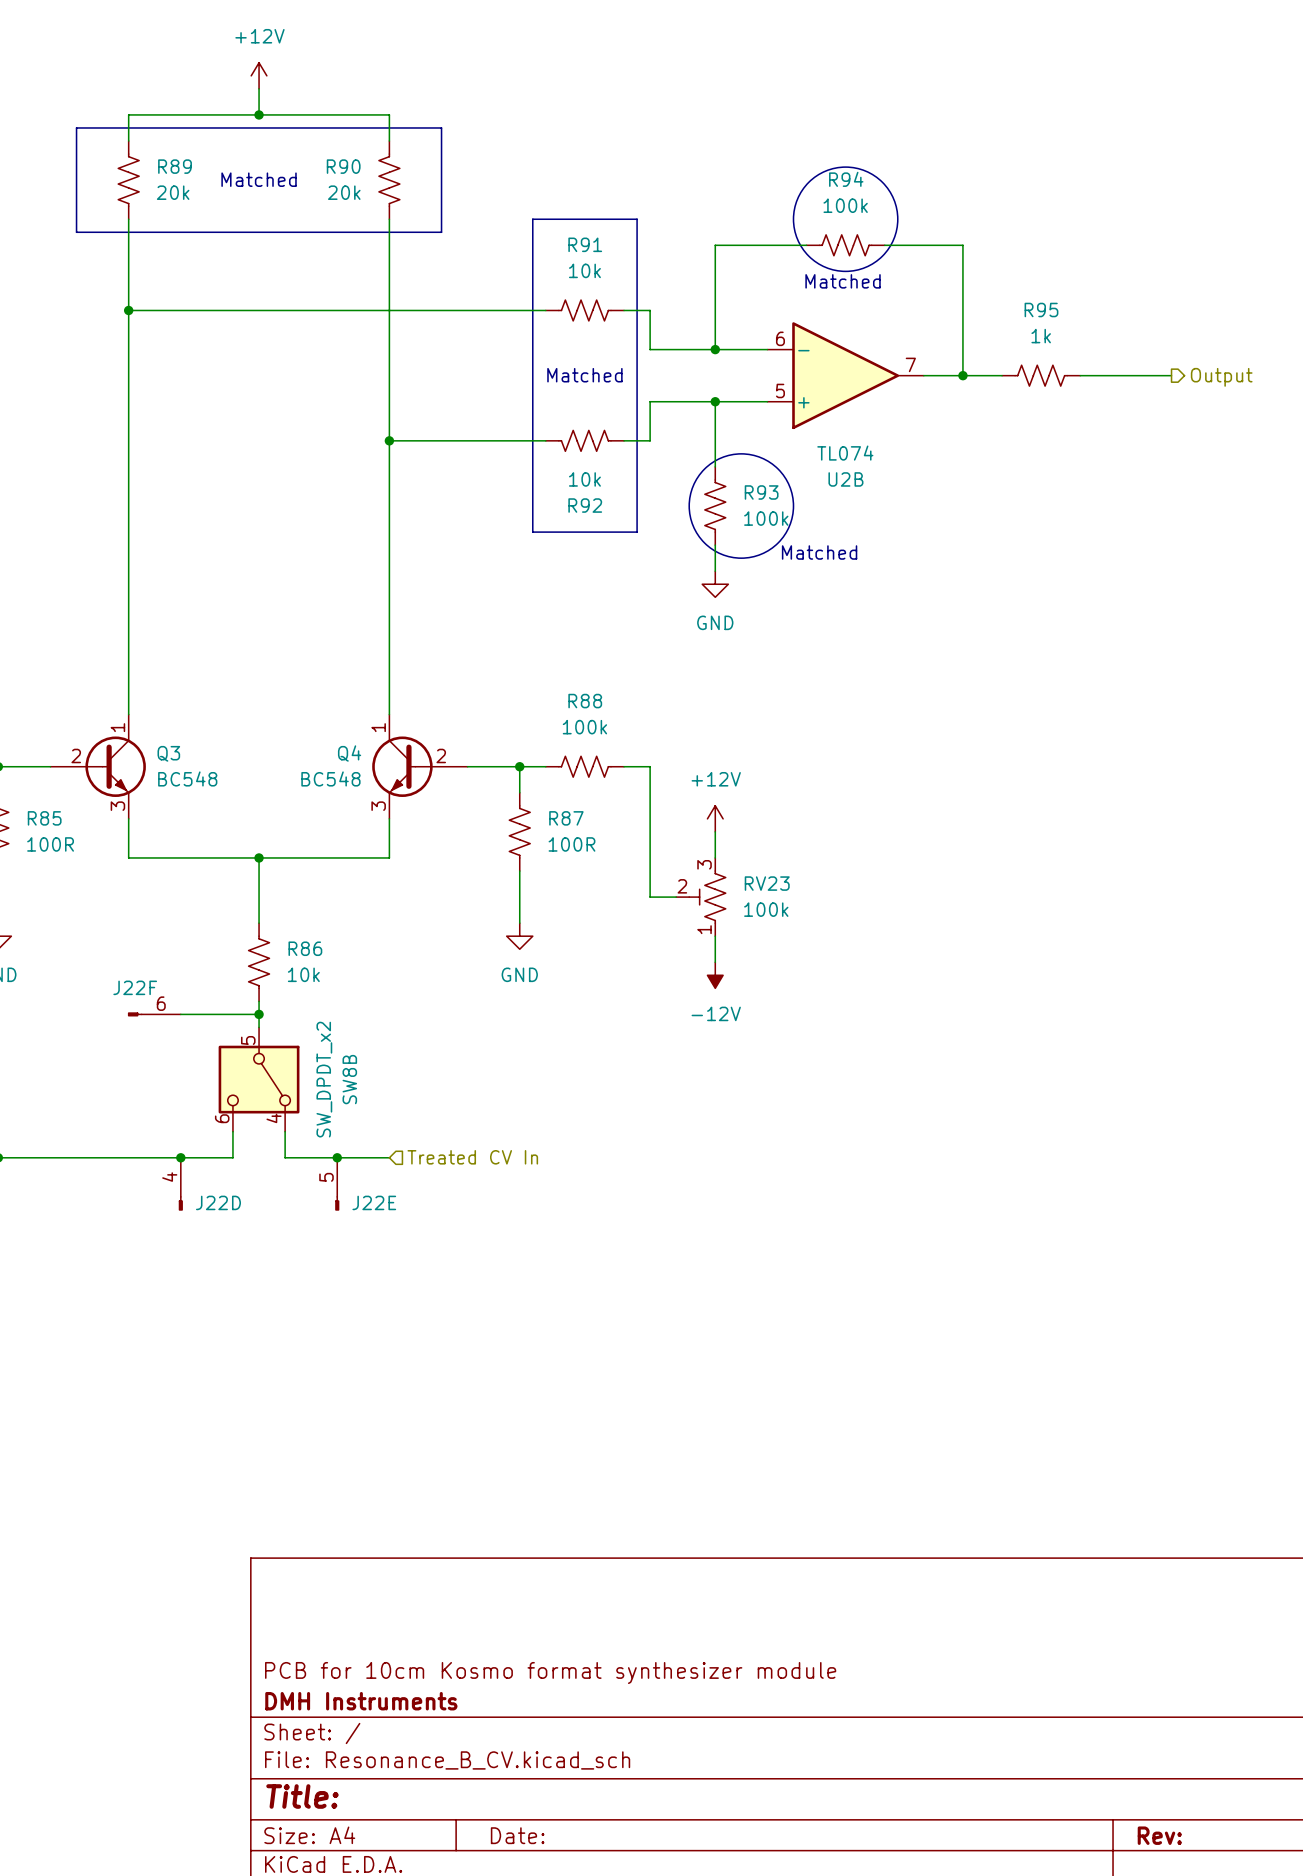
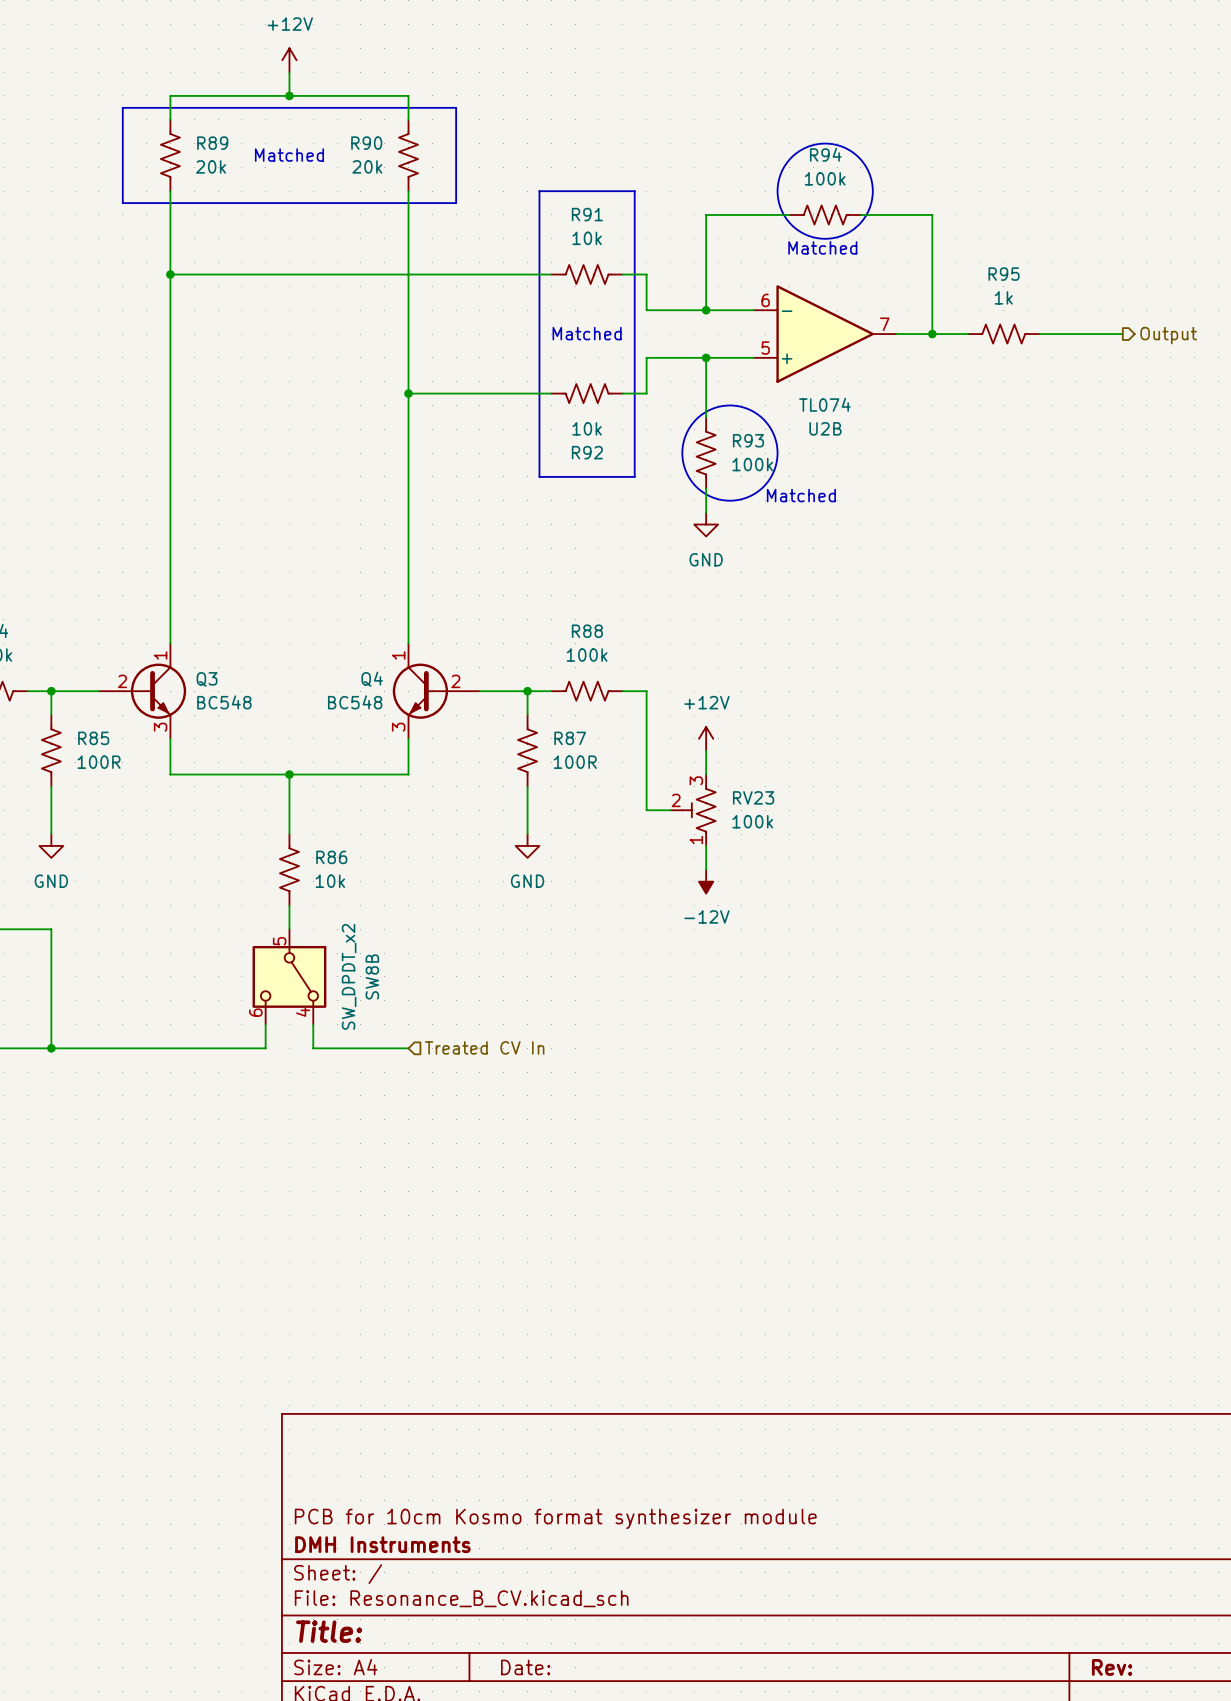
J22F: (154, 1014) -> none
wire: (180, 1014) (259, 1014) -> none
junction: (259, 1014) -> none
junction: (180, 1157) -> none
junction: (337, 1157) -> none
J22D: (180, 1184) -> none
J22E: (337, 1184) -> none

